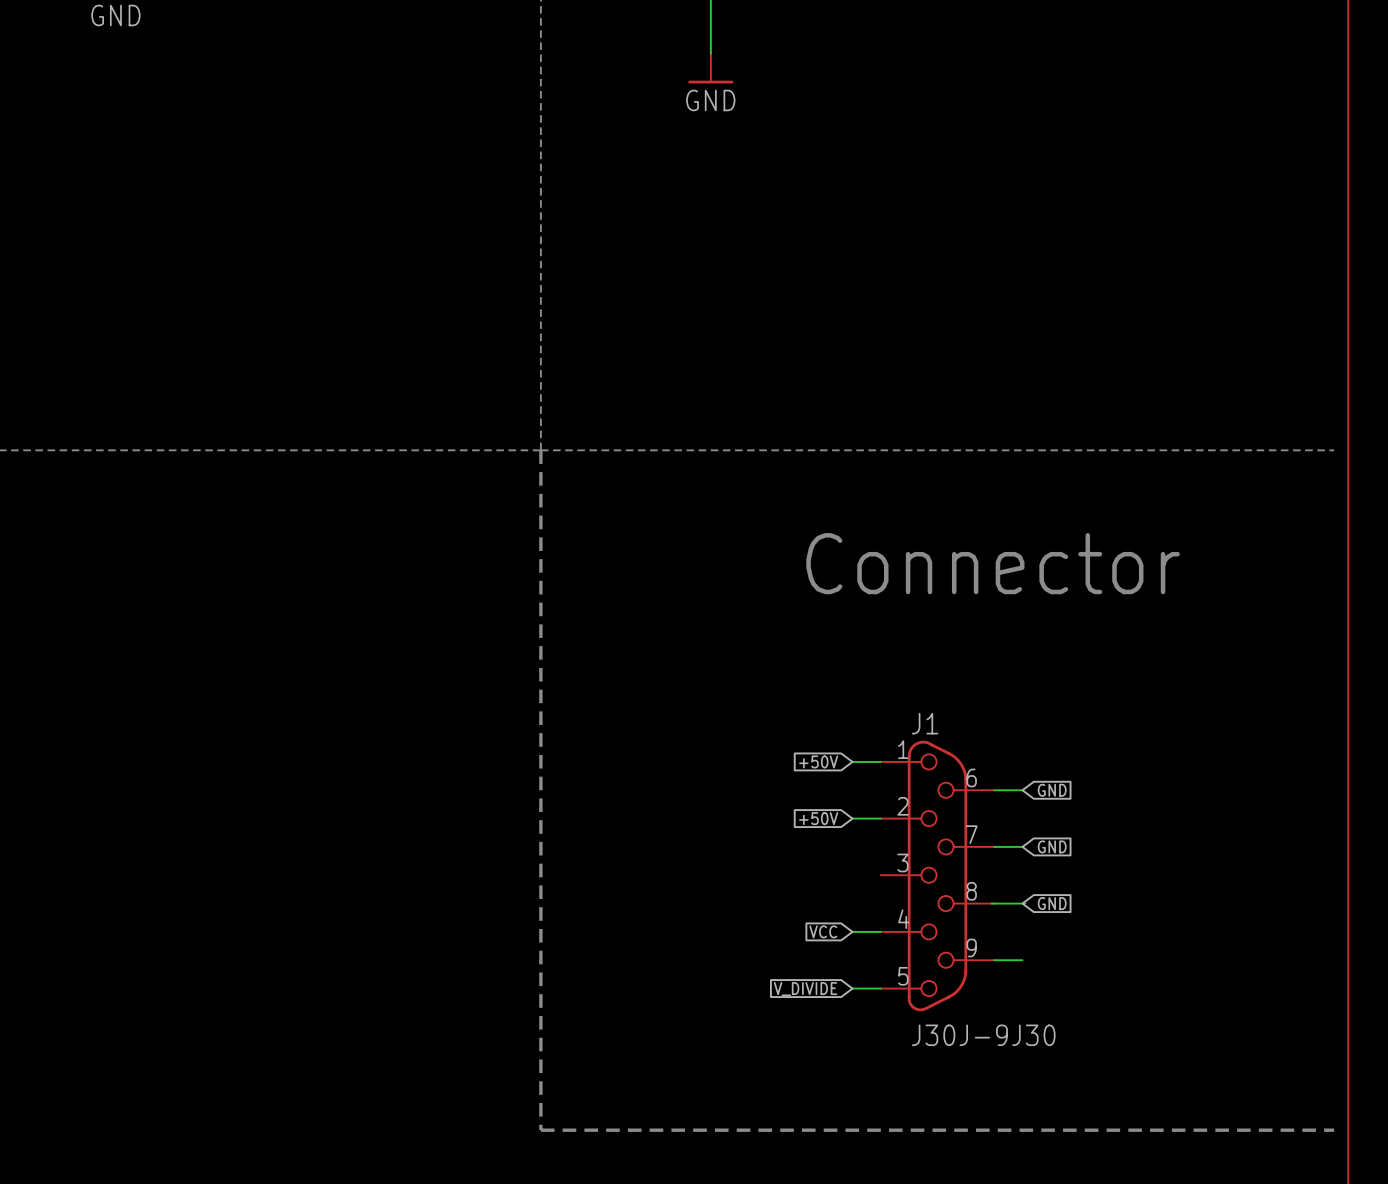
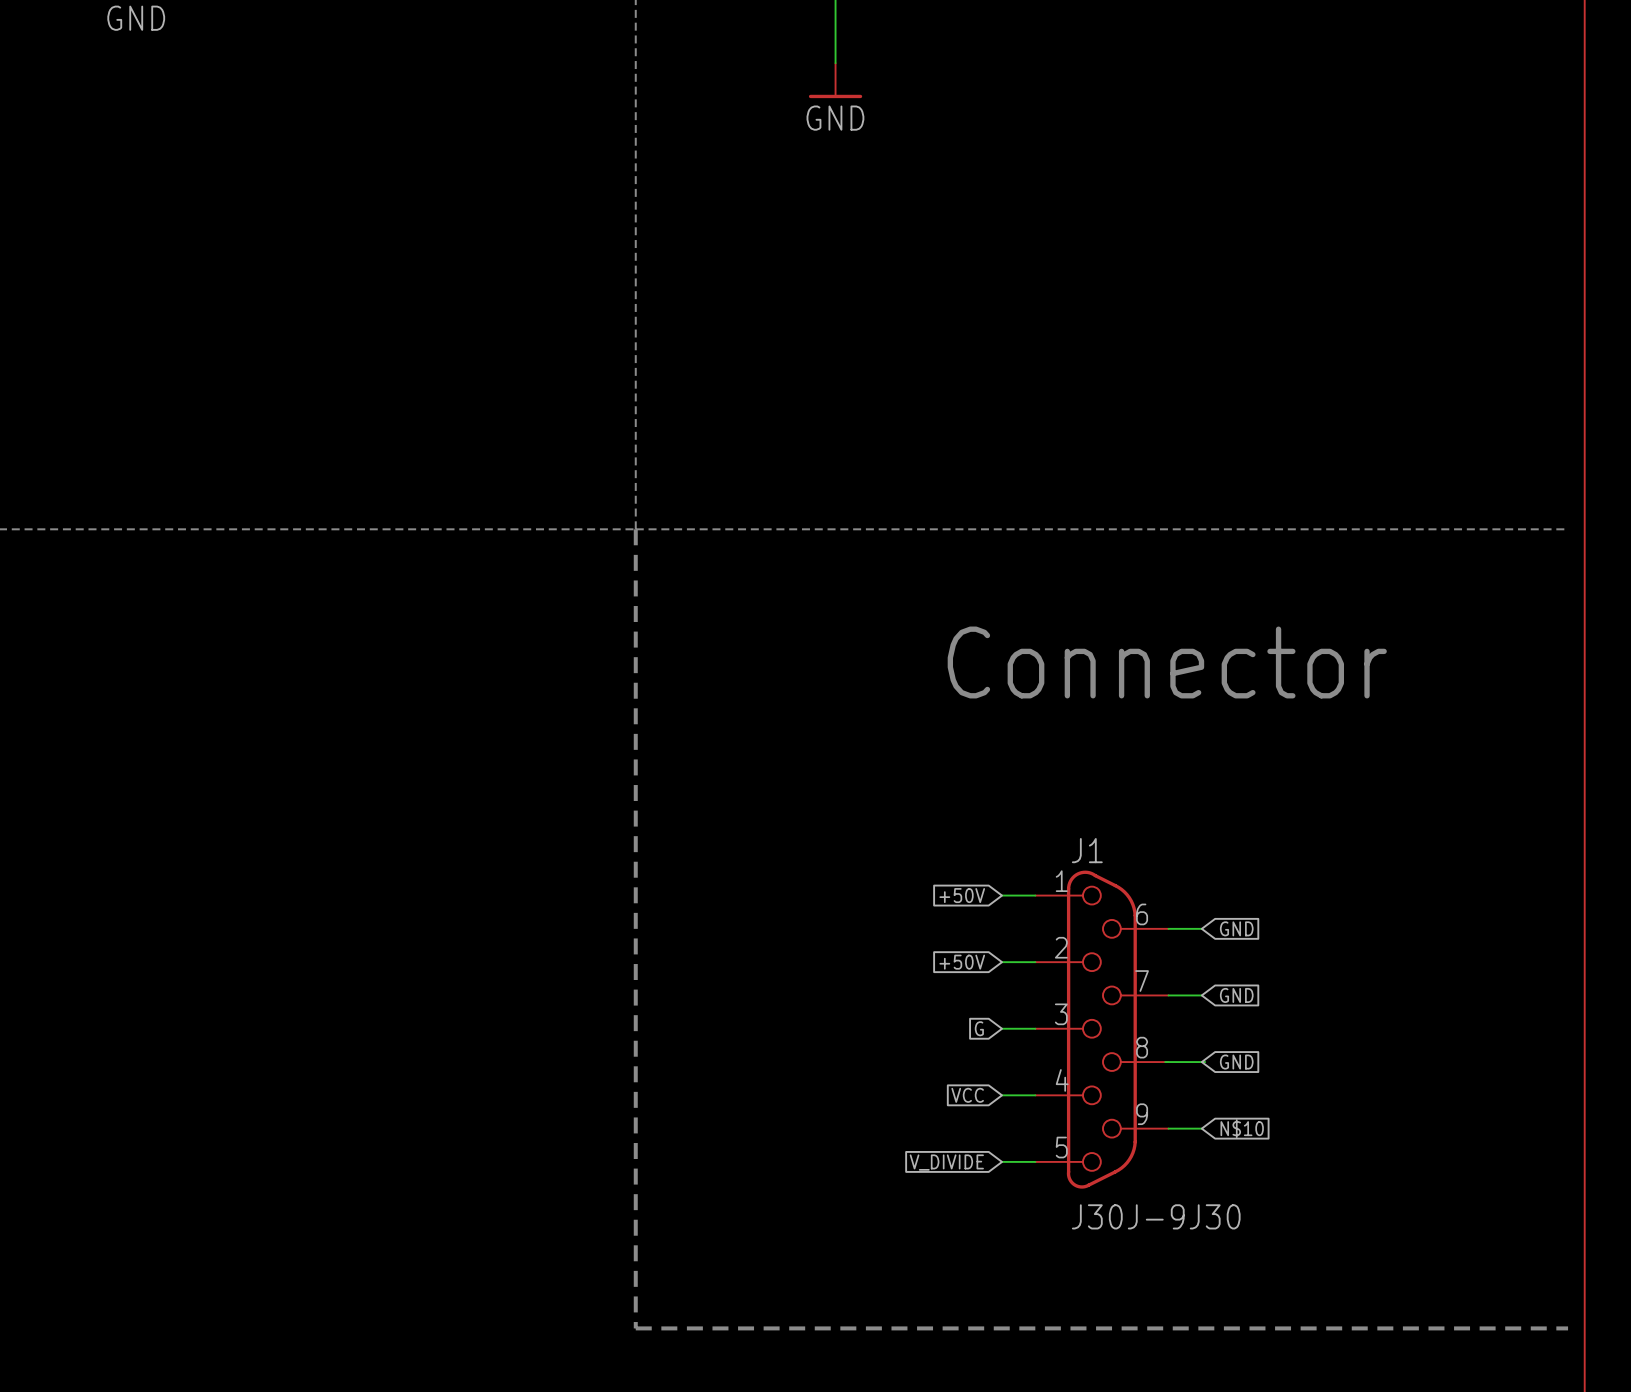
global label: none -> G (979, 1028)
wire: none -> (1002, 1028) (1035, 1028)
global label: none -> N$10 (1242, 1128)

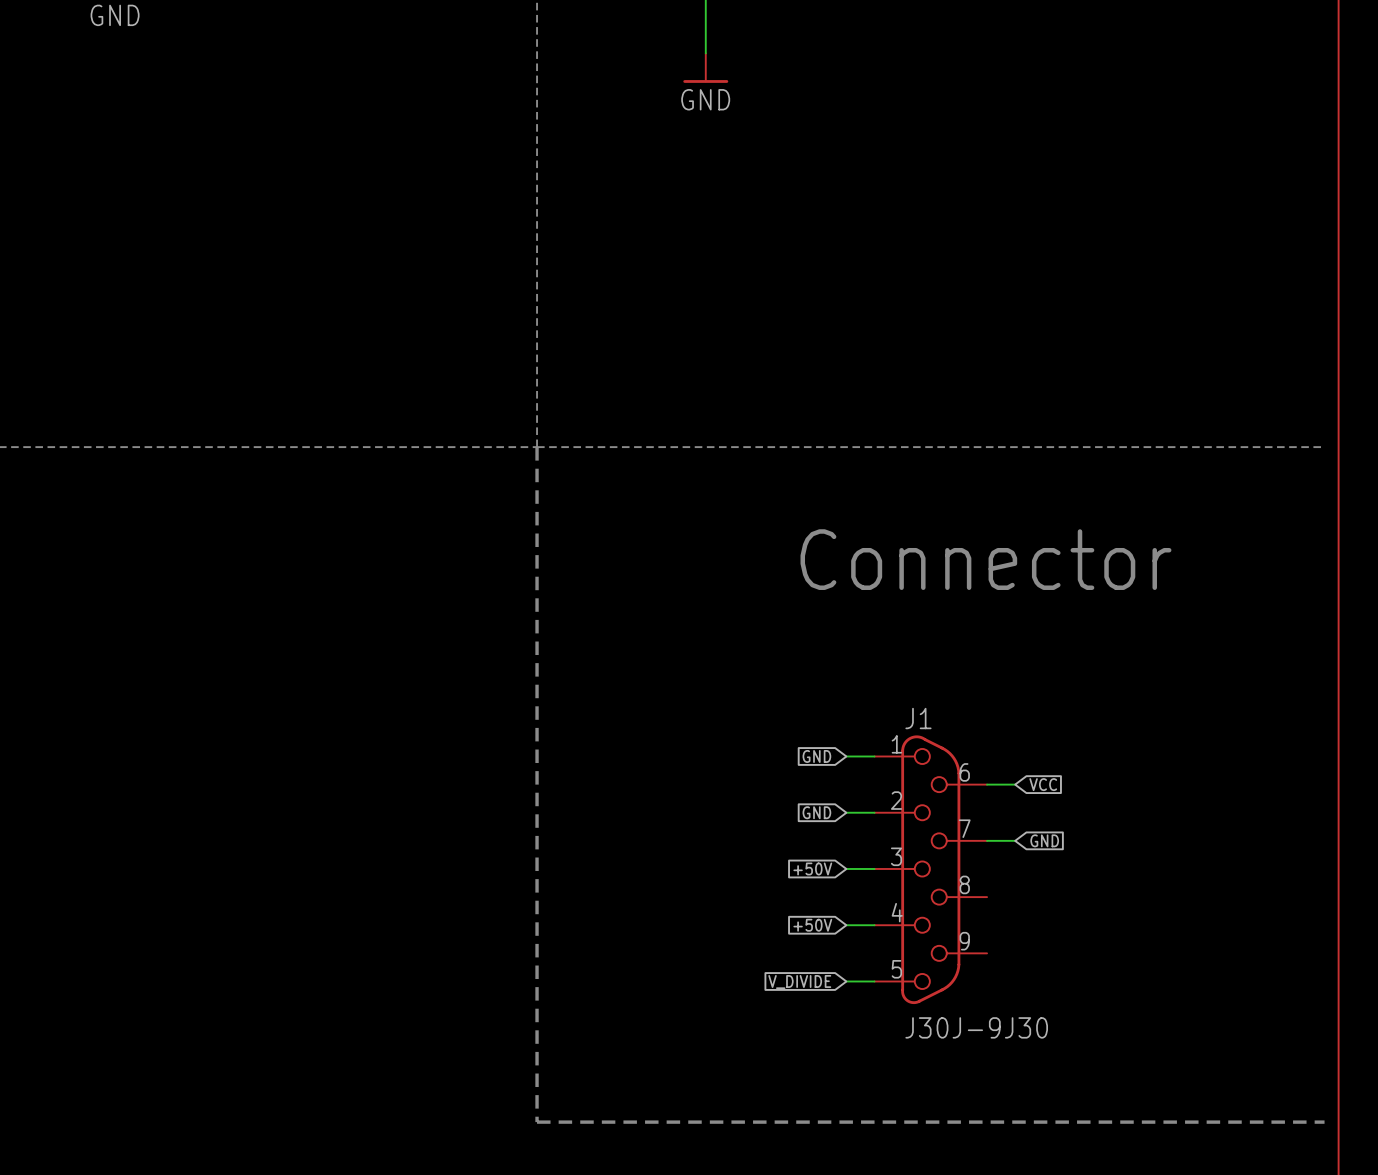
global label: +50V (962, 895) -> GND (816, 756)
global label: GND (1236, 928) -> VCC (1043, 784)
global label: +50V (962, 962) -> GND (816, 812)
global label: G (979, 1028) -> +50V (812, 868)
wire: (1165, 1062) (1205, 1062) -> none
global label: GND (1236, 1062) -> none
global label: VCC (967, 1095) -> +50V (812, 925)
wire: (1168, 1128) (1201, 1128) -> none
global label: N$10 (1242, 1128) -> none

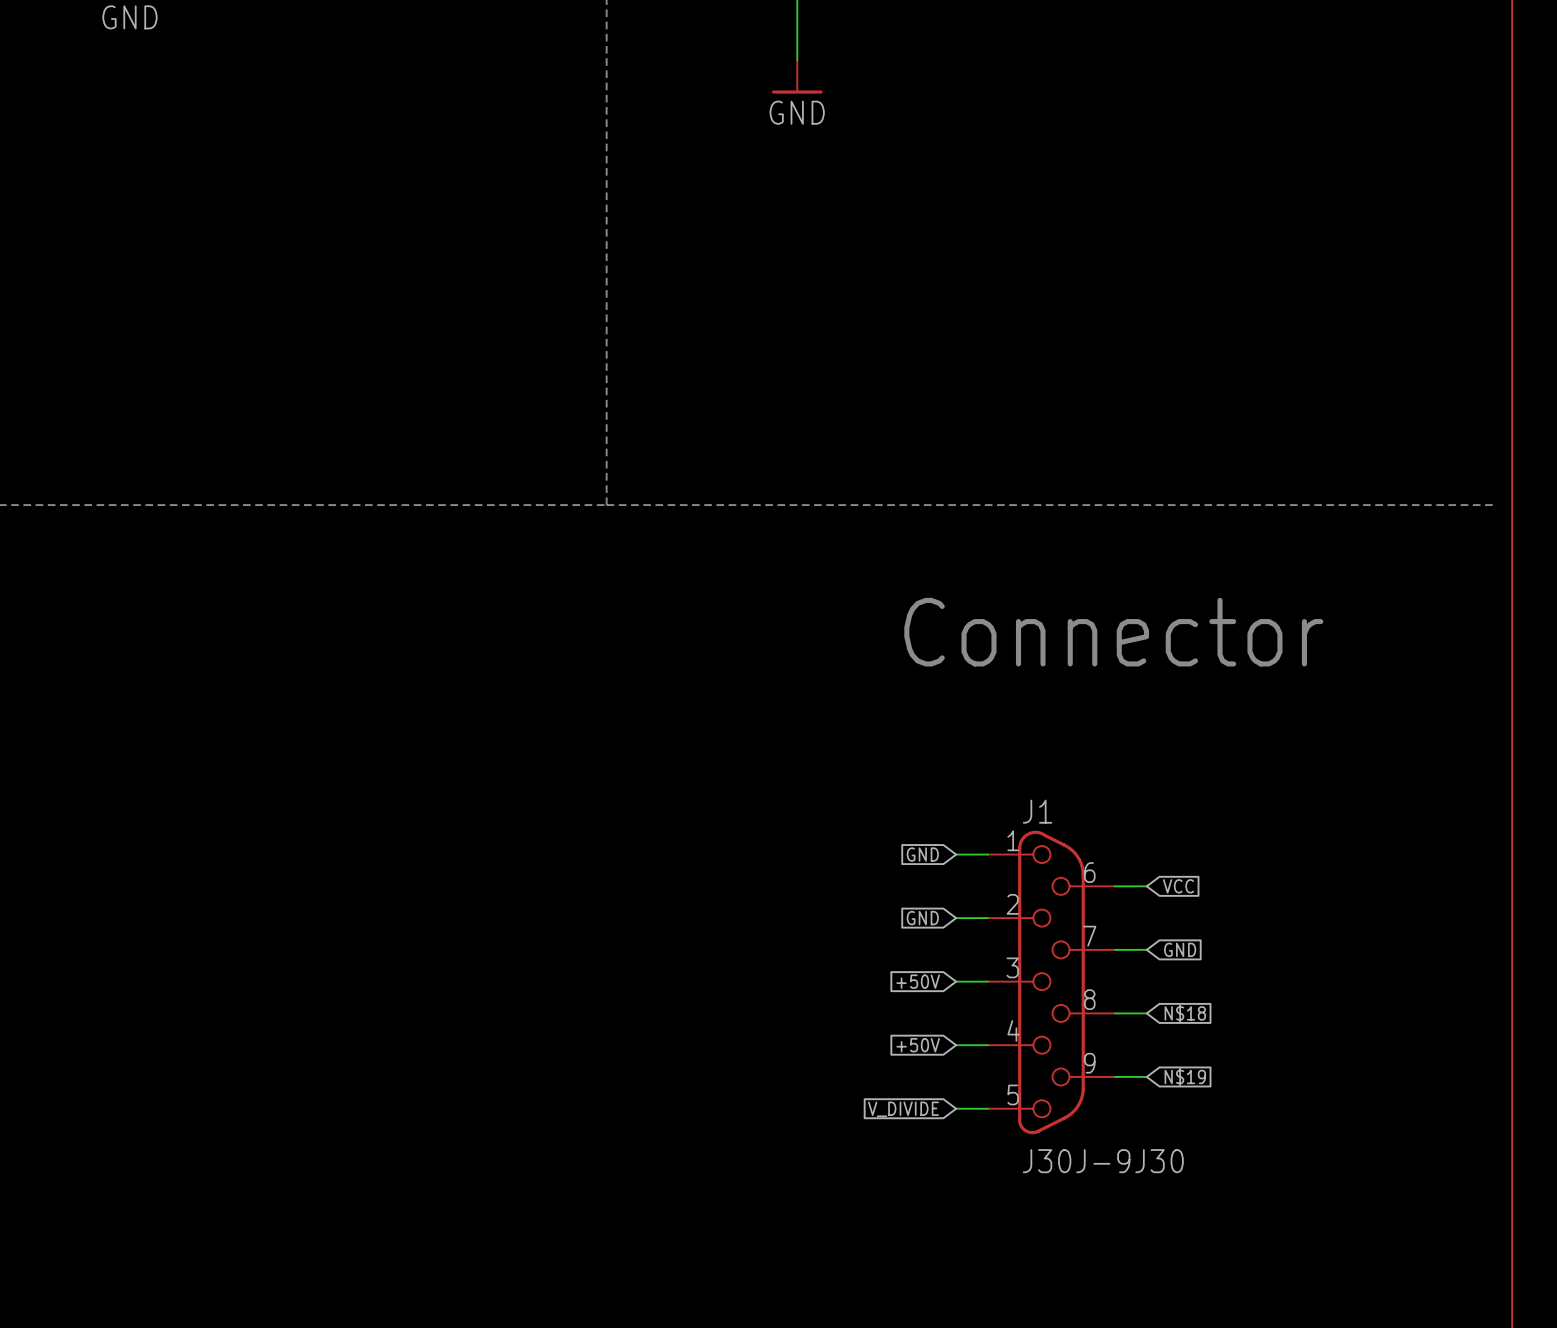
line: (537, 447) (537, 1122) (1324, 1122) -> none
wire: none -> (1115, 1013) (1146, 1013)
global label: none -> N$18 (1185, 1013)
wire: none -> (1115, 1076) (1146, 1076)
global label: none -> N$19 (1185, 1076)

